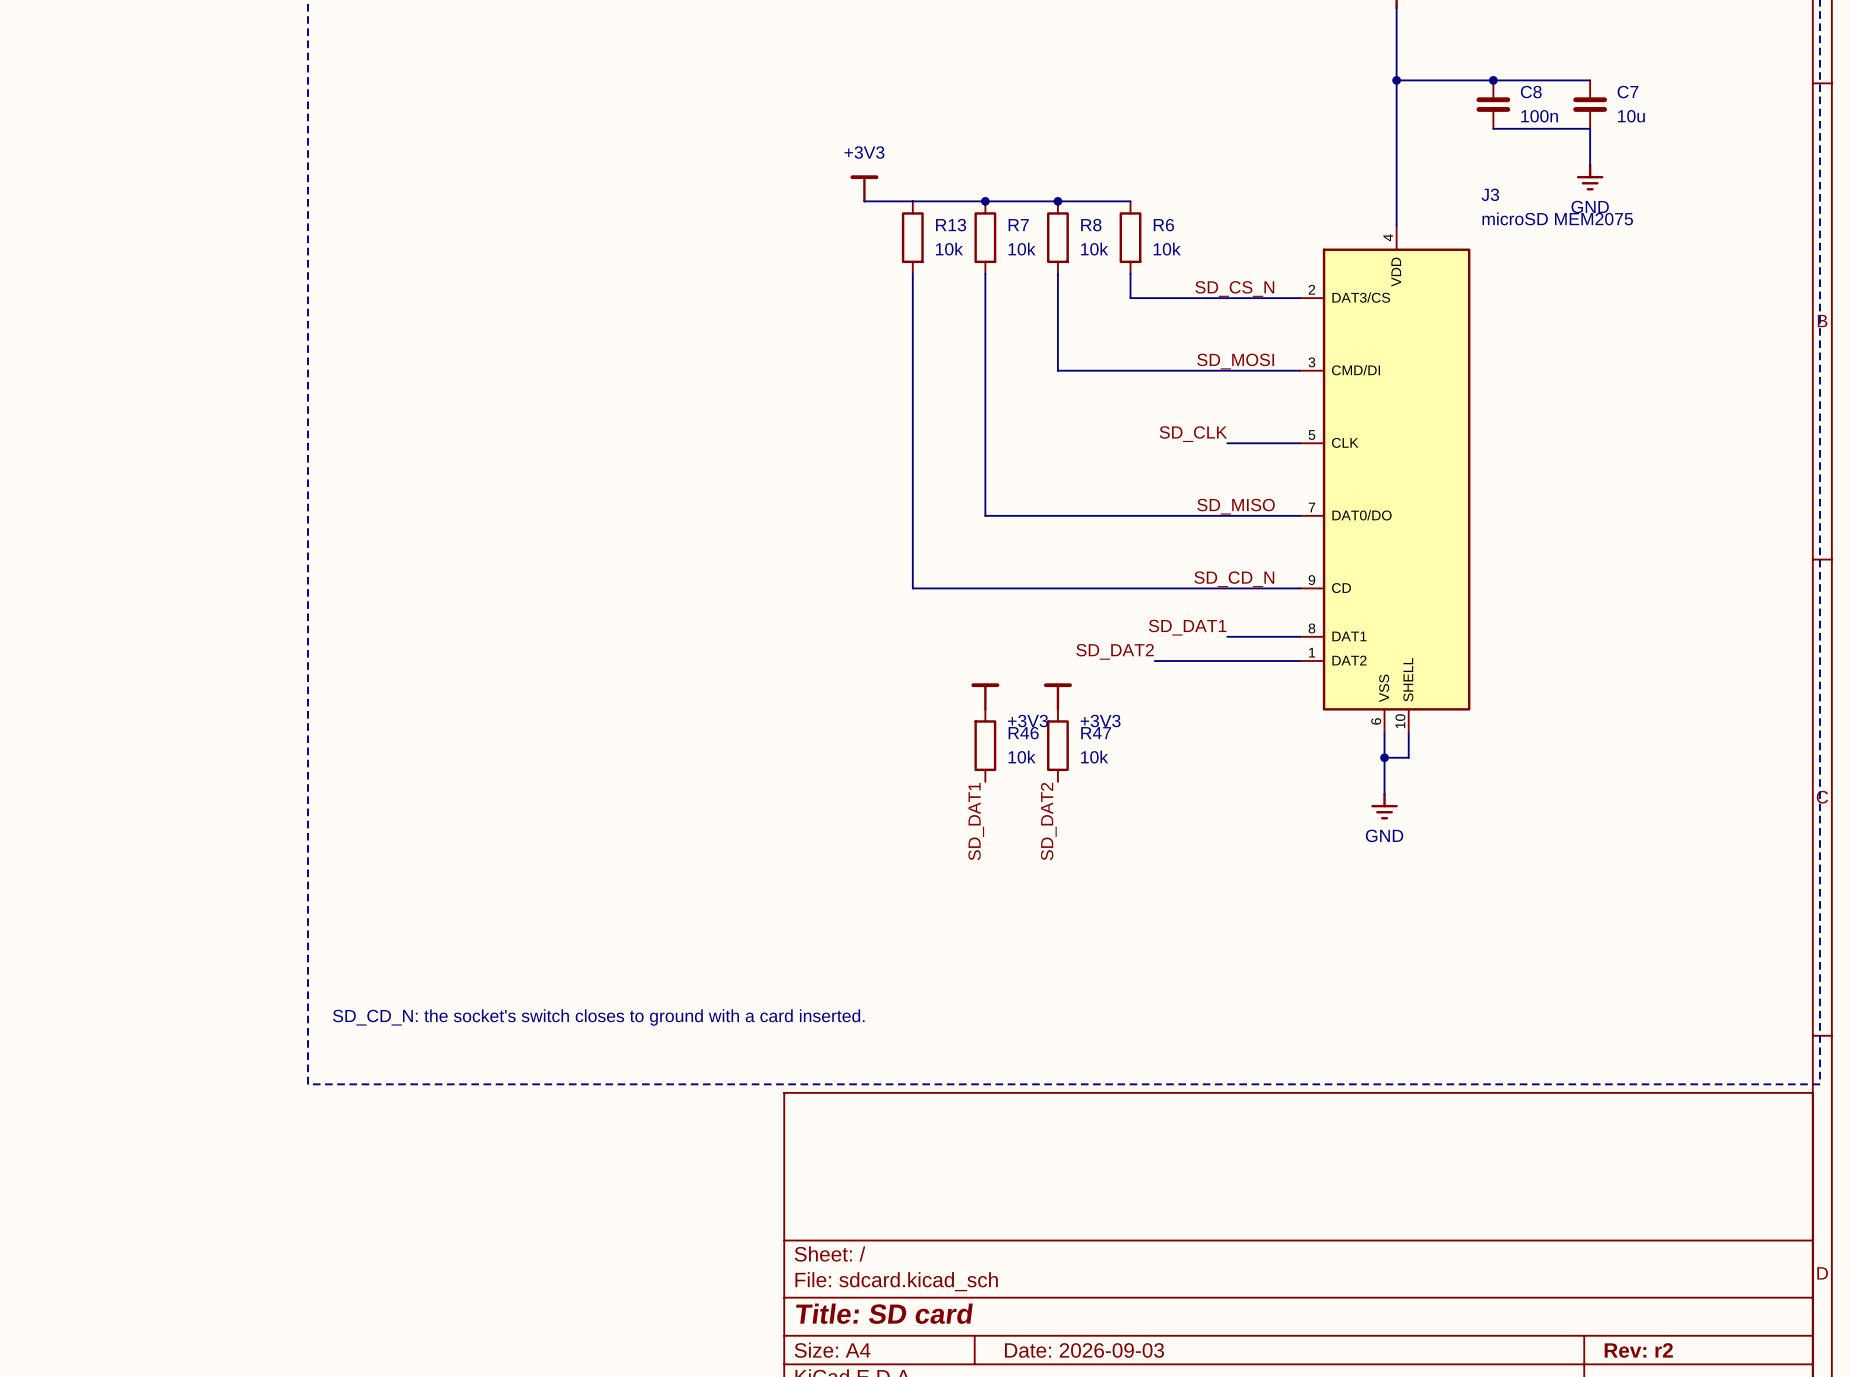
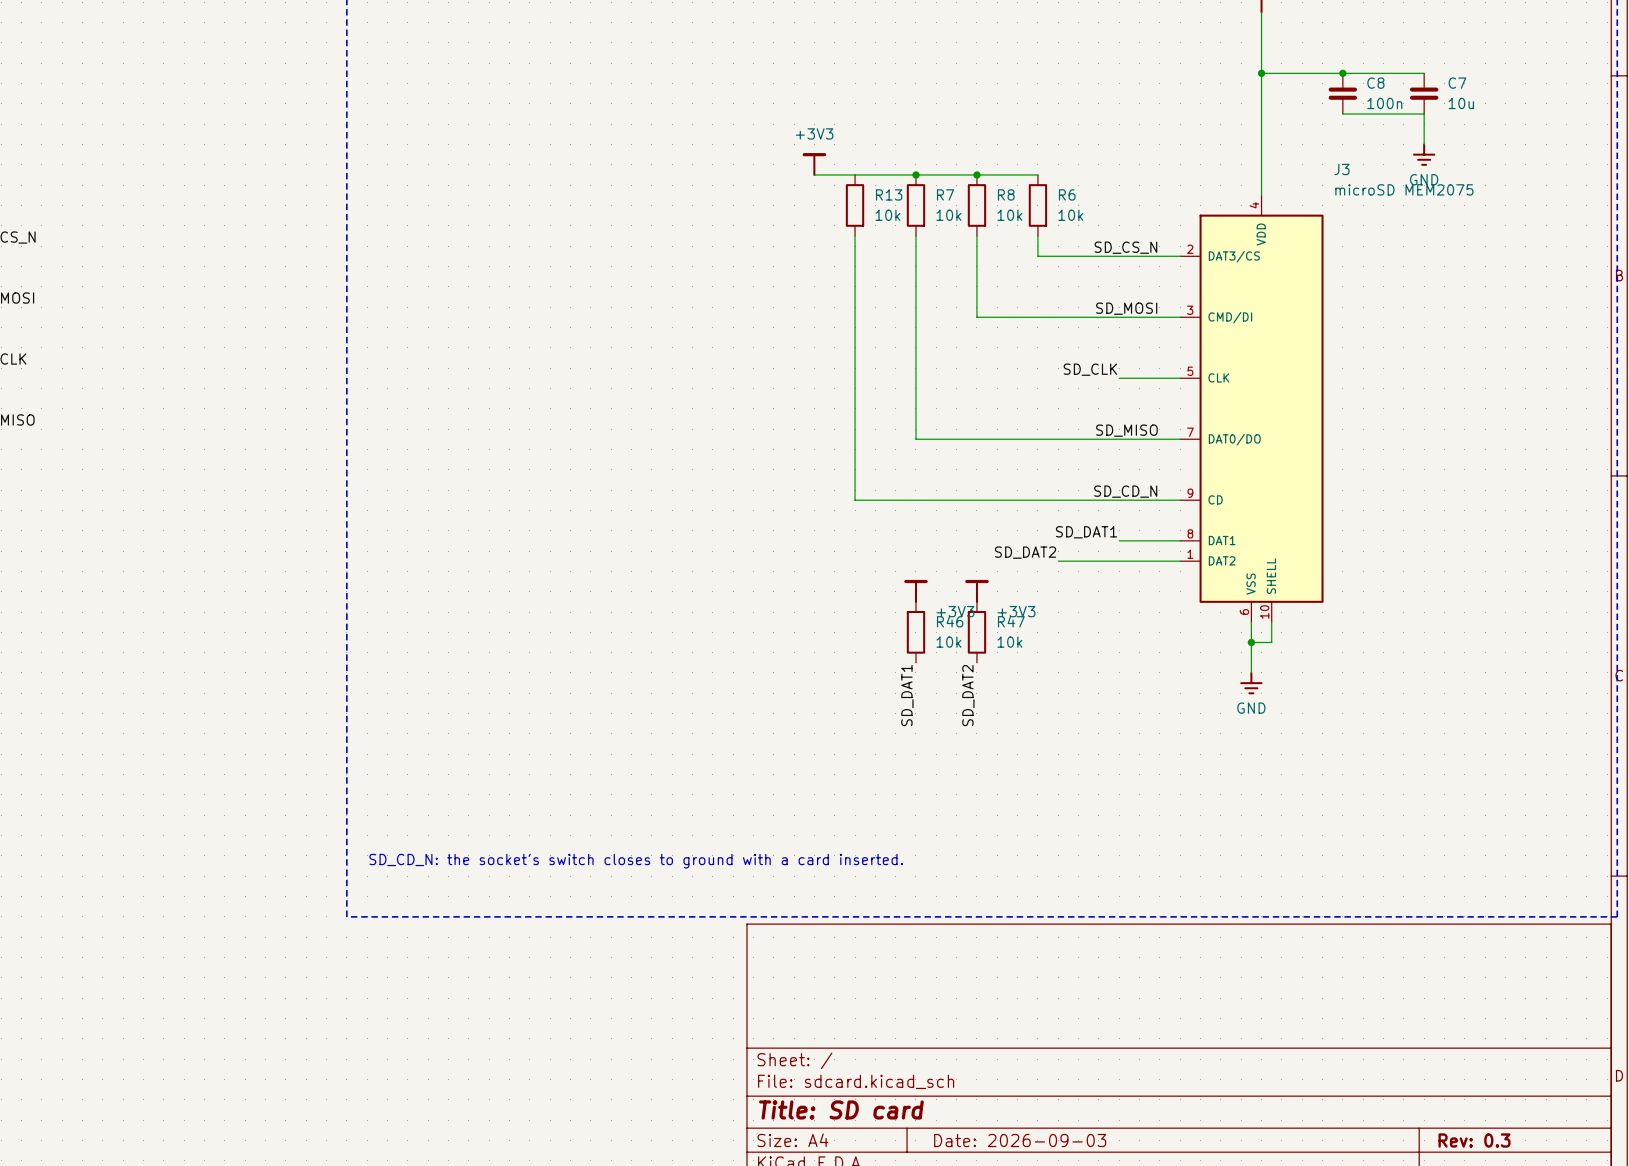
title block: Rev: r2 (1638, 1350) -> Rev: 0.3 (1474, 1140)

